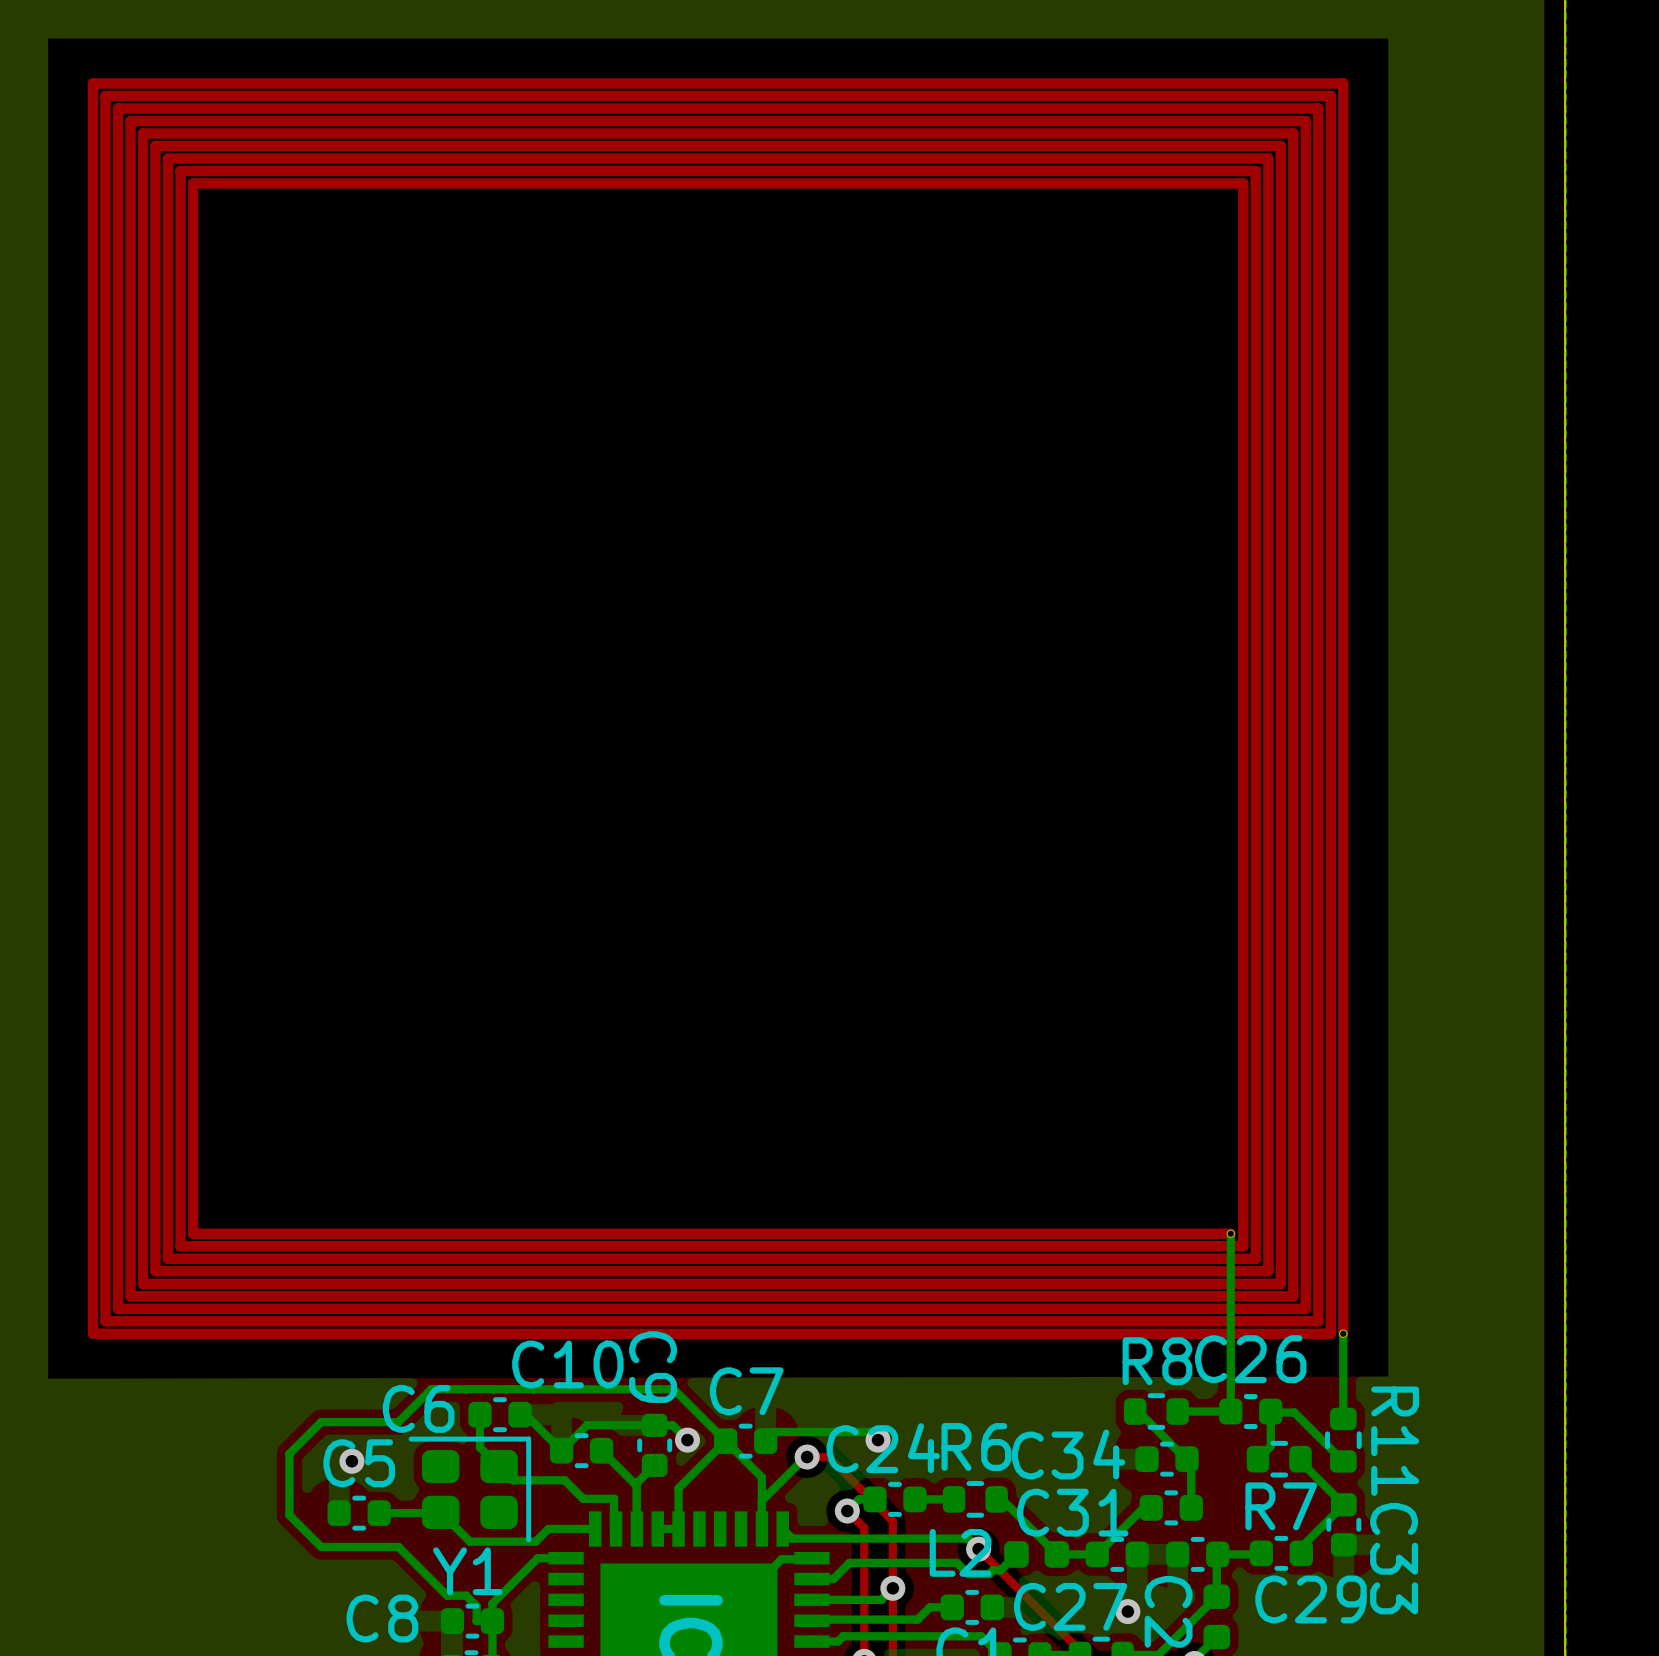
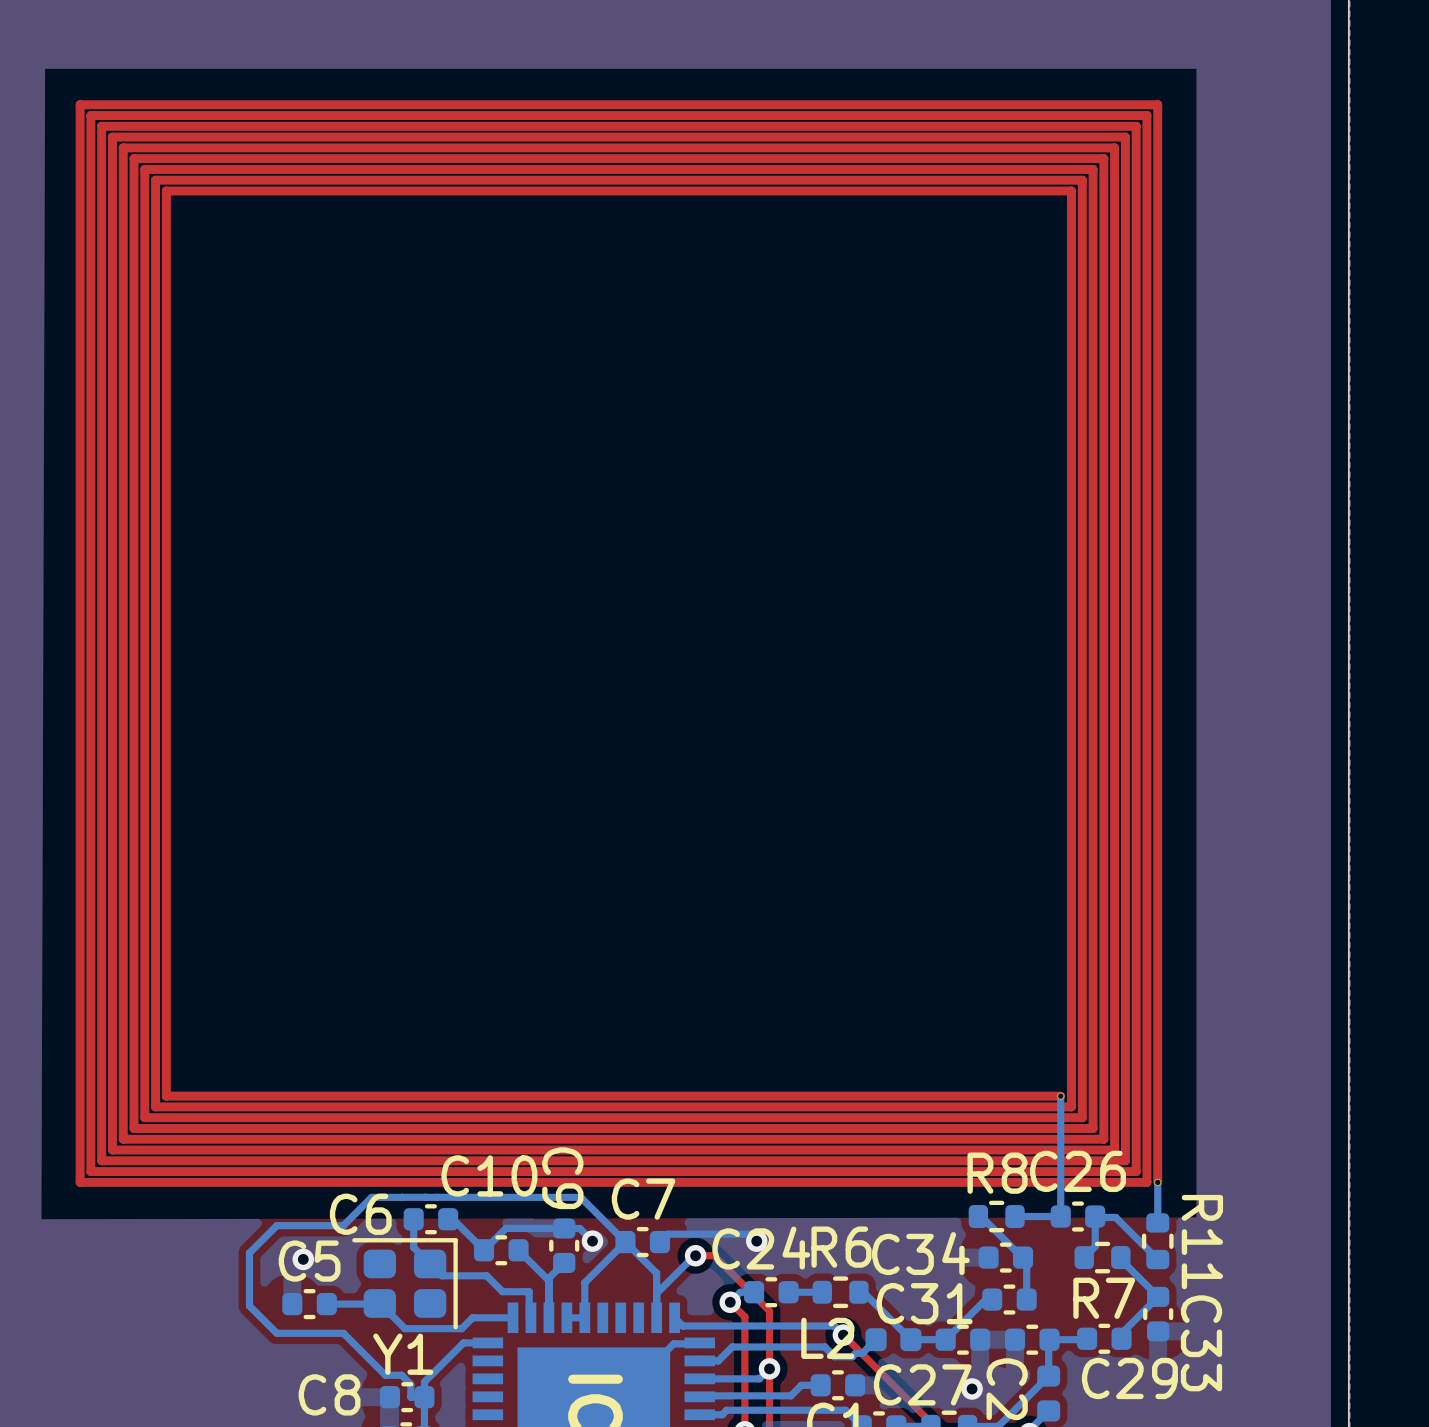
part position: (718, 708) -> (618, 643)
bottom track: (1230, 1233) (1230, 1271) -> none
bottom track: (1343, 1333) (1343, 1371) -> none

